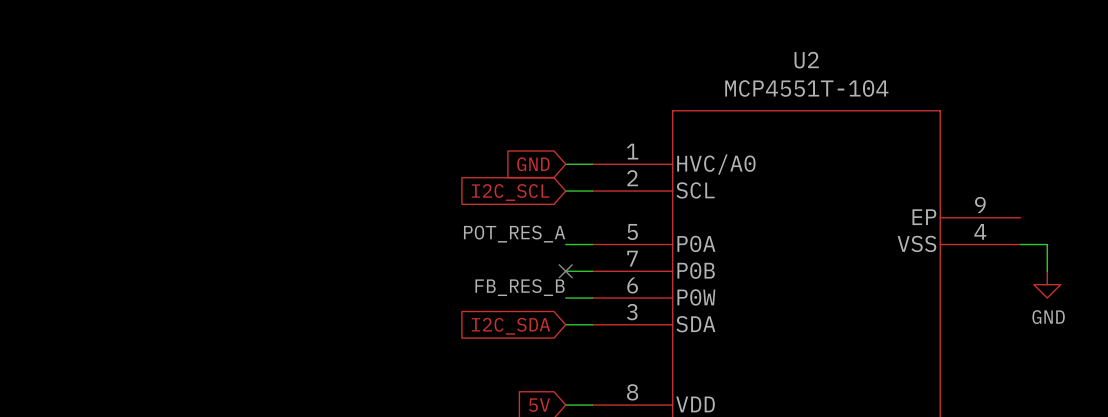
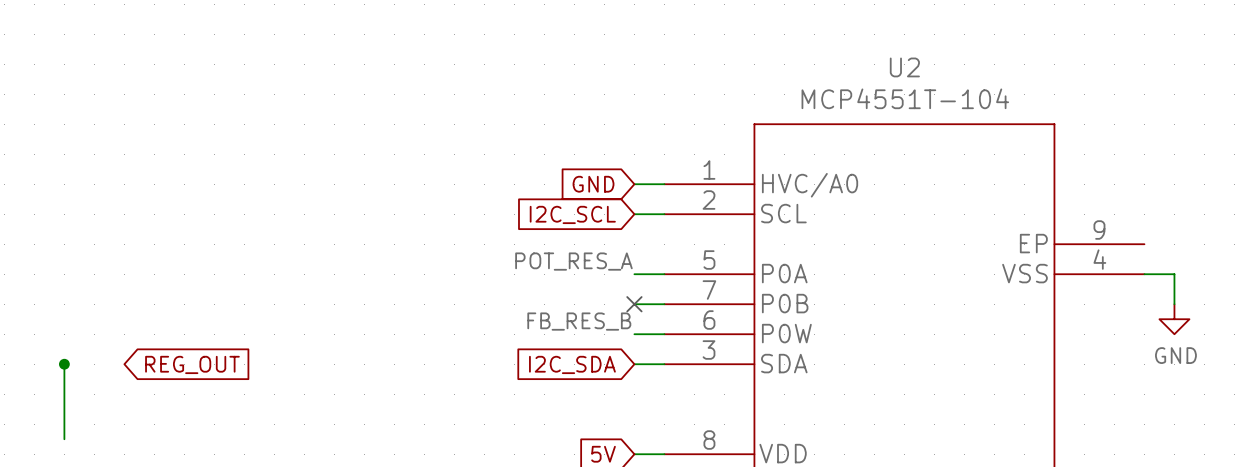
wire: none -> (64, 364) (64, 439)
junction: none -> (64, 364)
global label: none -> REG_OUT (192, 364)

